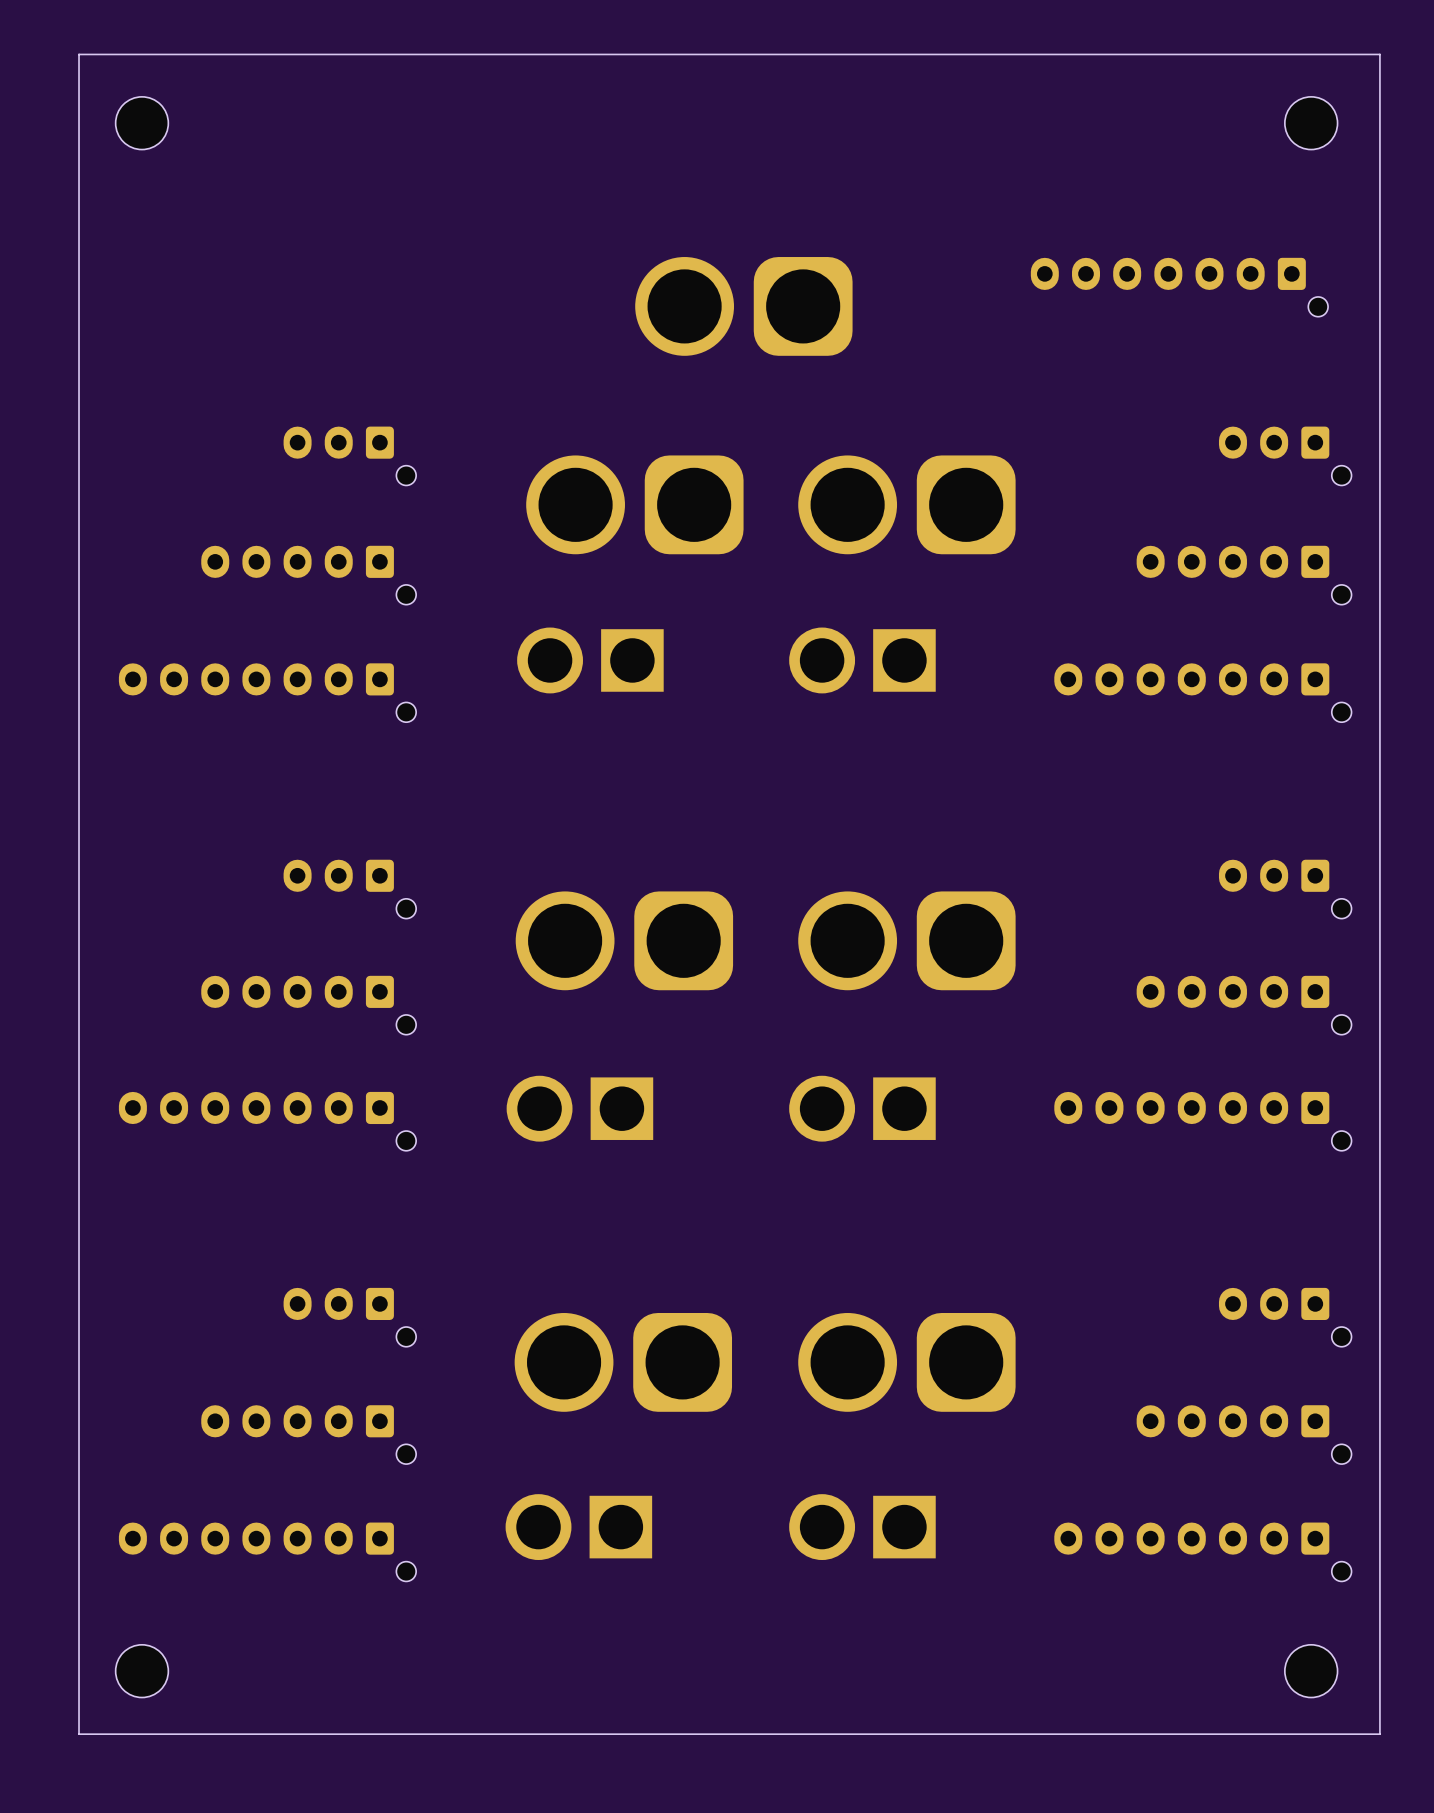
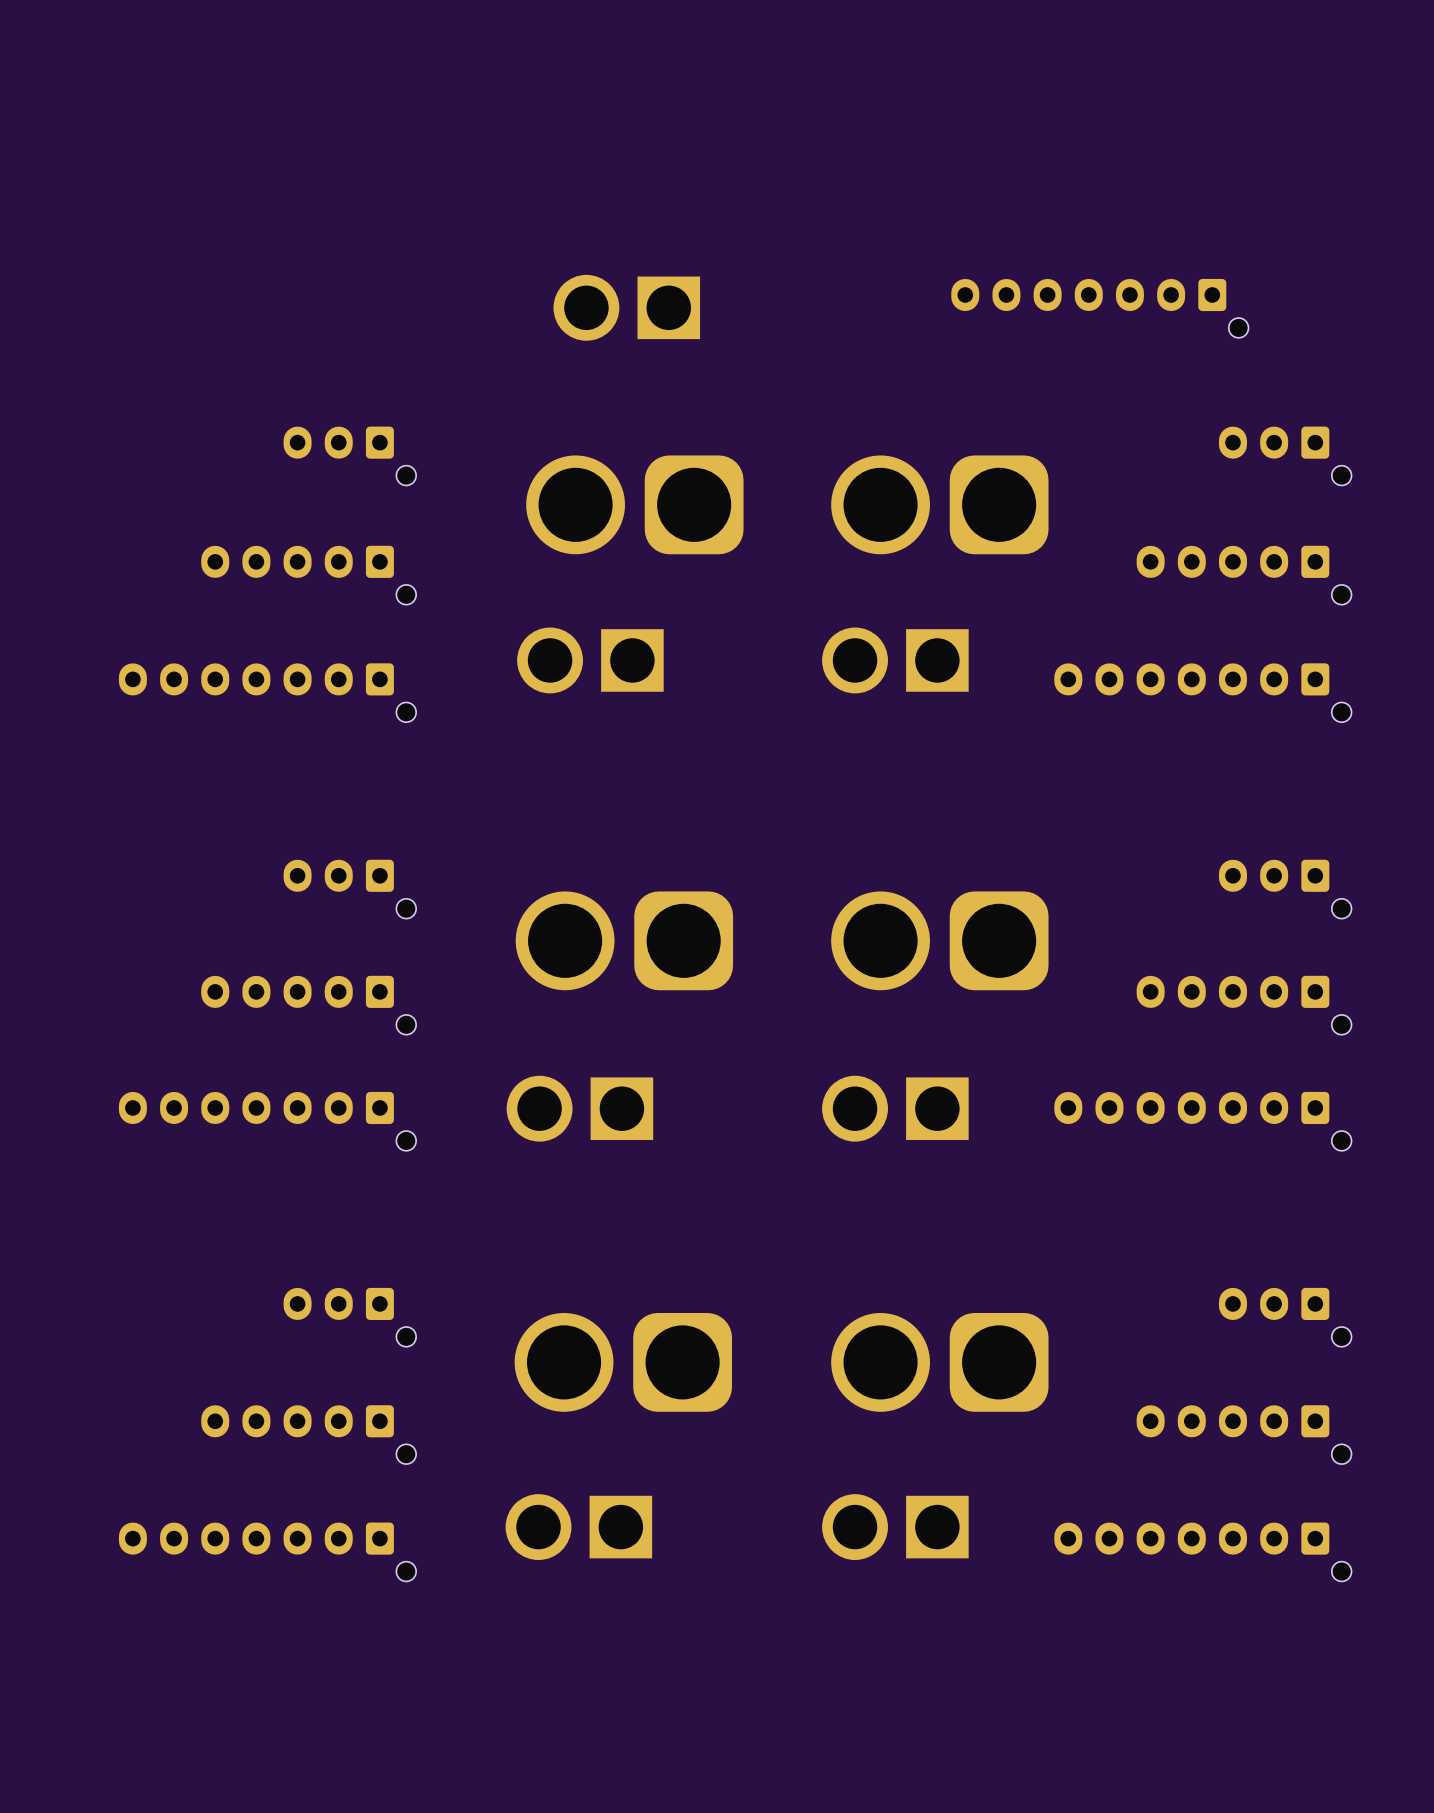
board edge: (1379, 54) (79, 54) (79, 1734) (1379, 1734) (1379, 54) -> none
part: (141, 123) -> none
part: (1311, 123) -> none
part position: (1179, 287) -> (1099, 308)
part: (743, 306) -> none
part: none -> (626, 307)
part position: (906, 504) -> (939, 504)
part position: (862, 660) -> (895, 660)
part position: (906, 940) -> (939, 940)
part position: (862, 1108) -> (895, 1108)
part position: (906, 1362) -> (939, 1362)
part position: (862, 1527) -> (895, 1527)
part: (141, 1671) -> none
part: (1311, 1671) -> none

